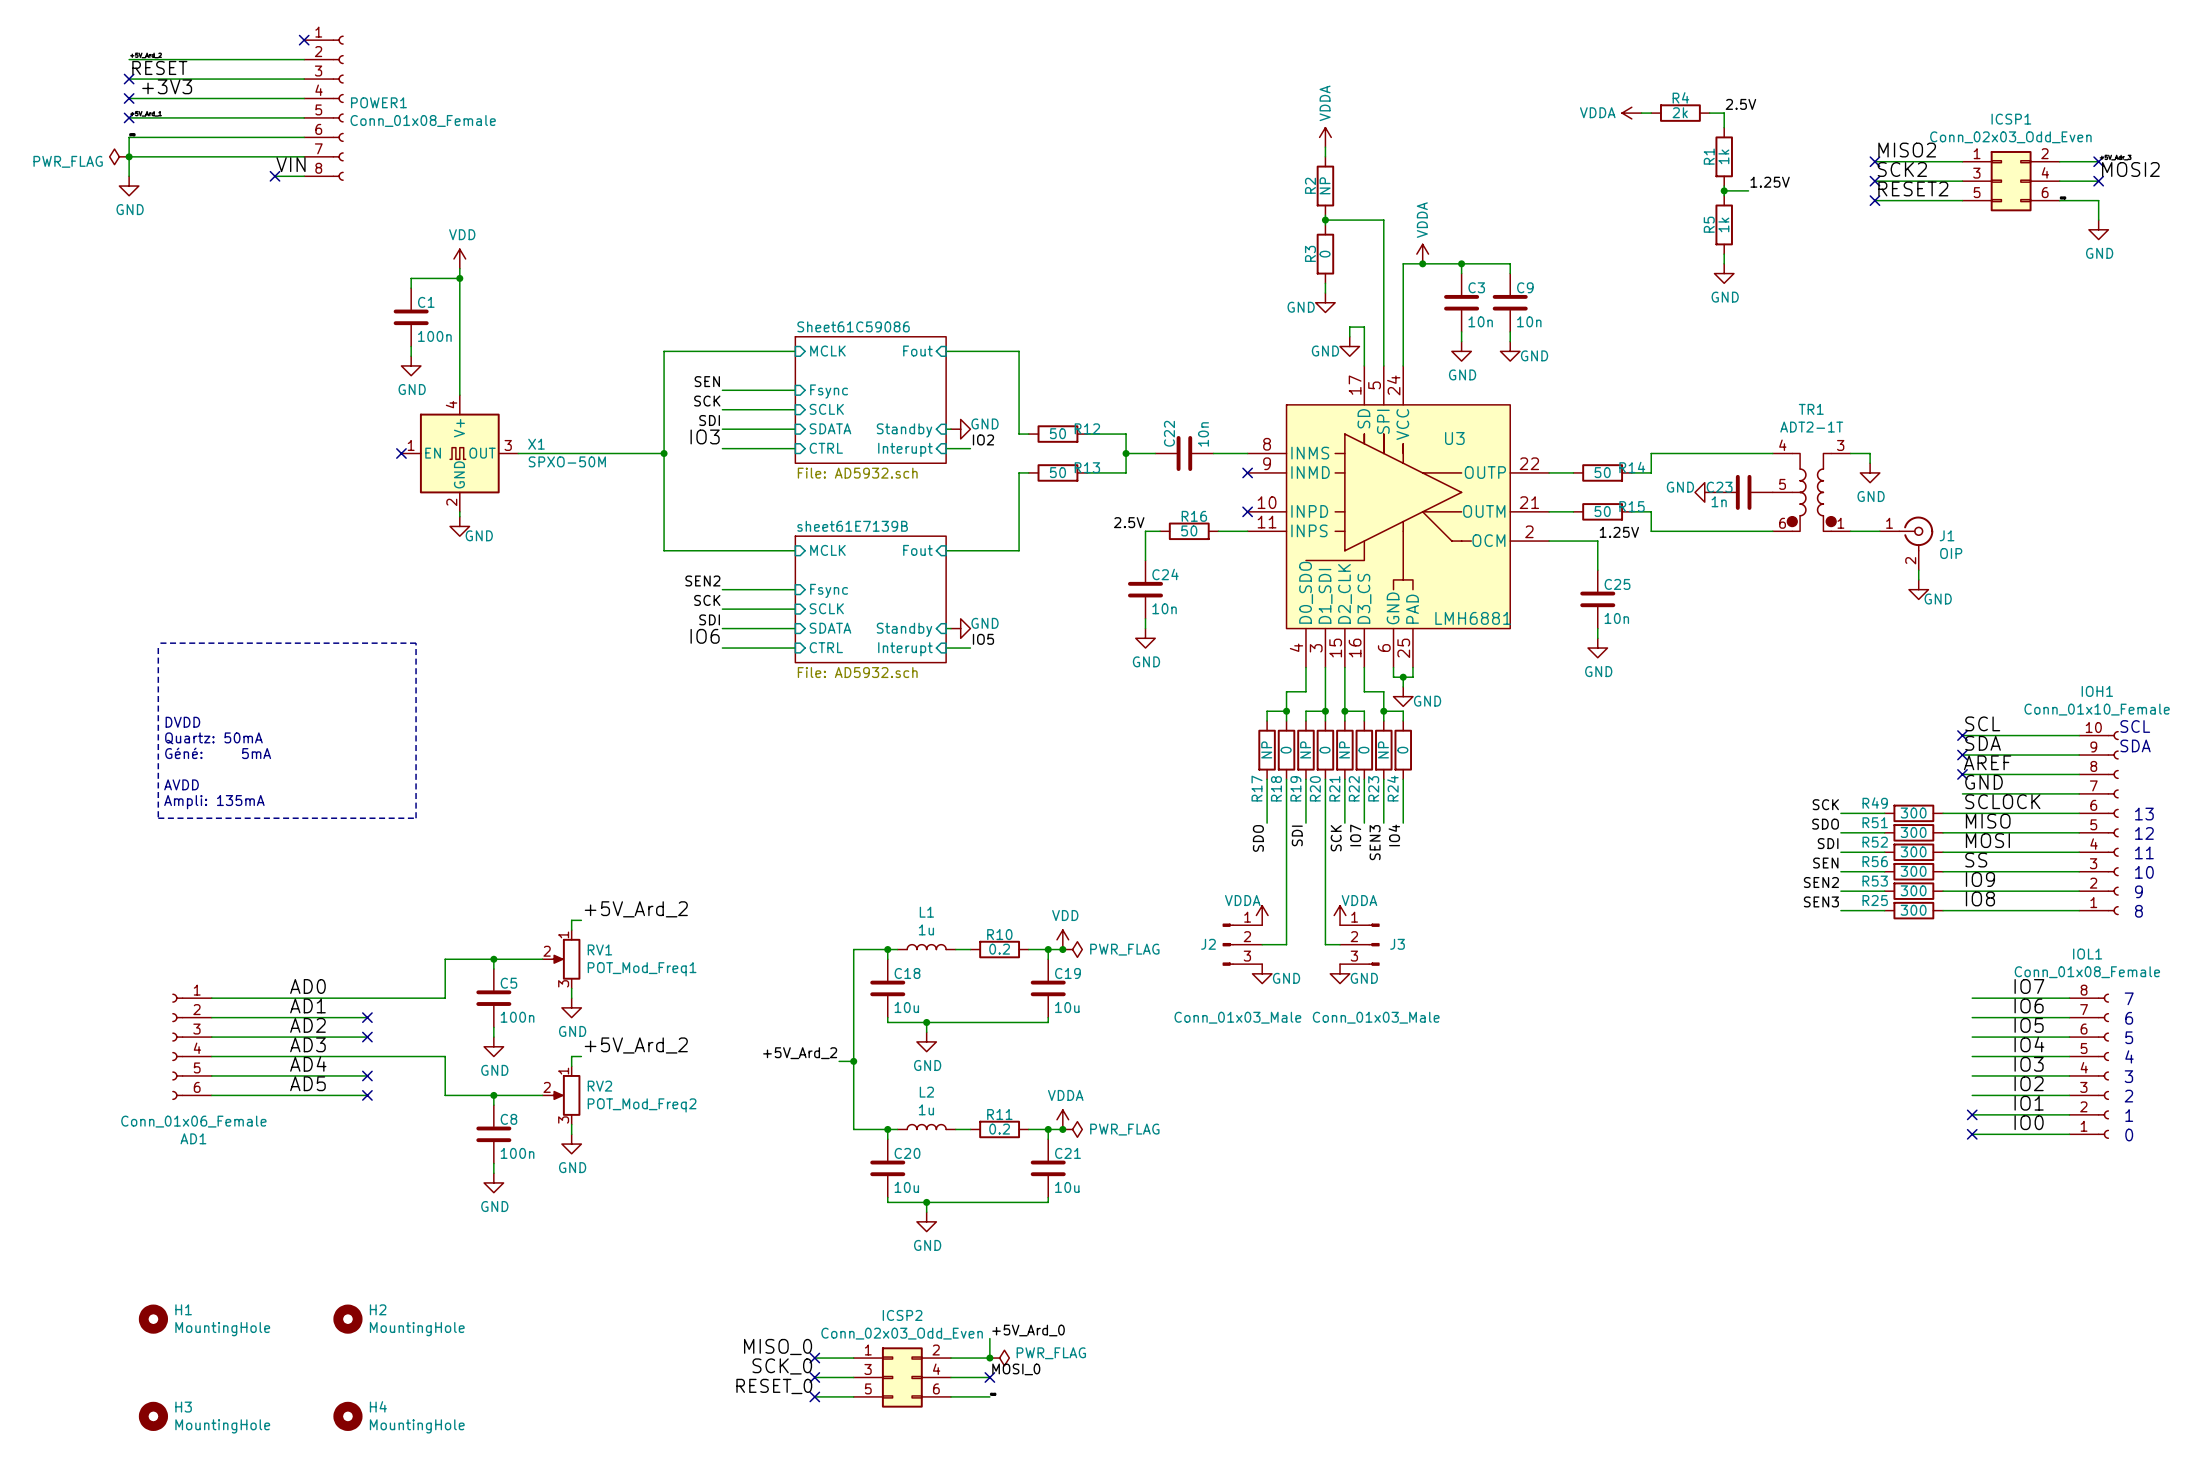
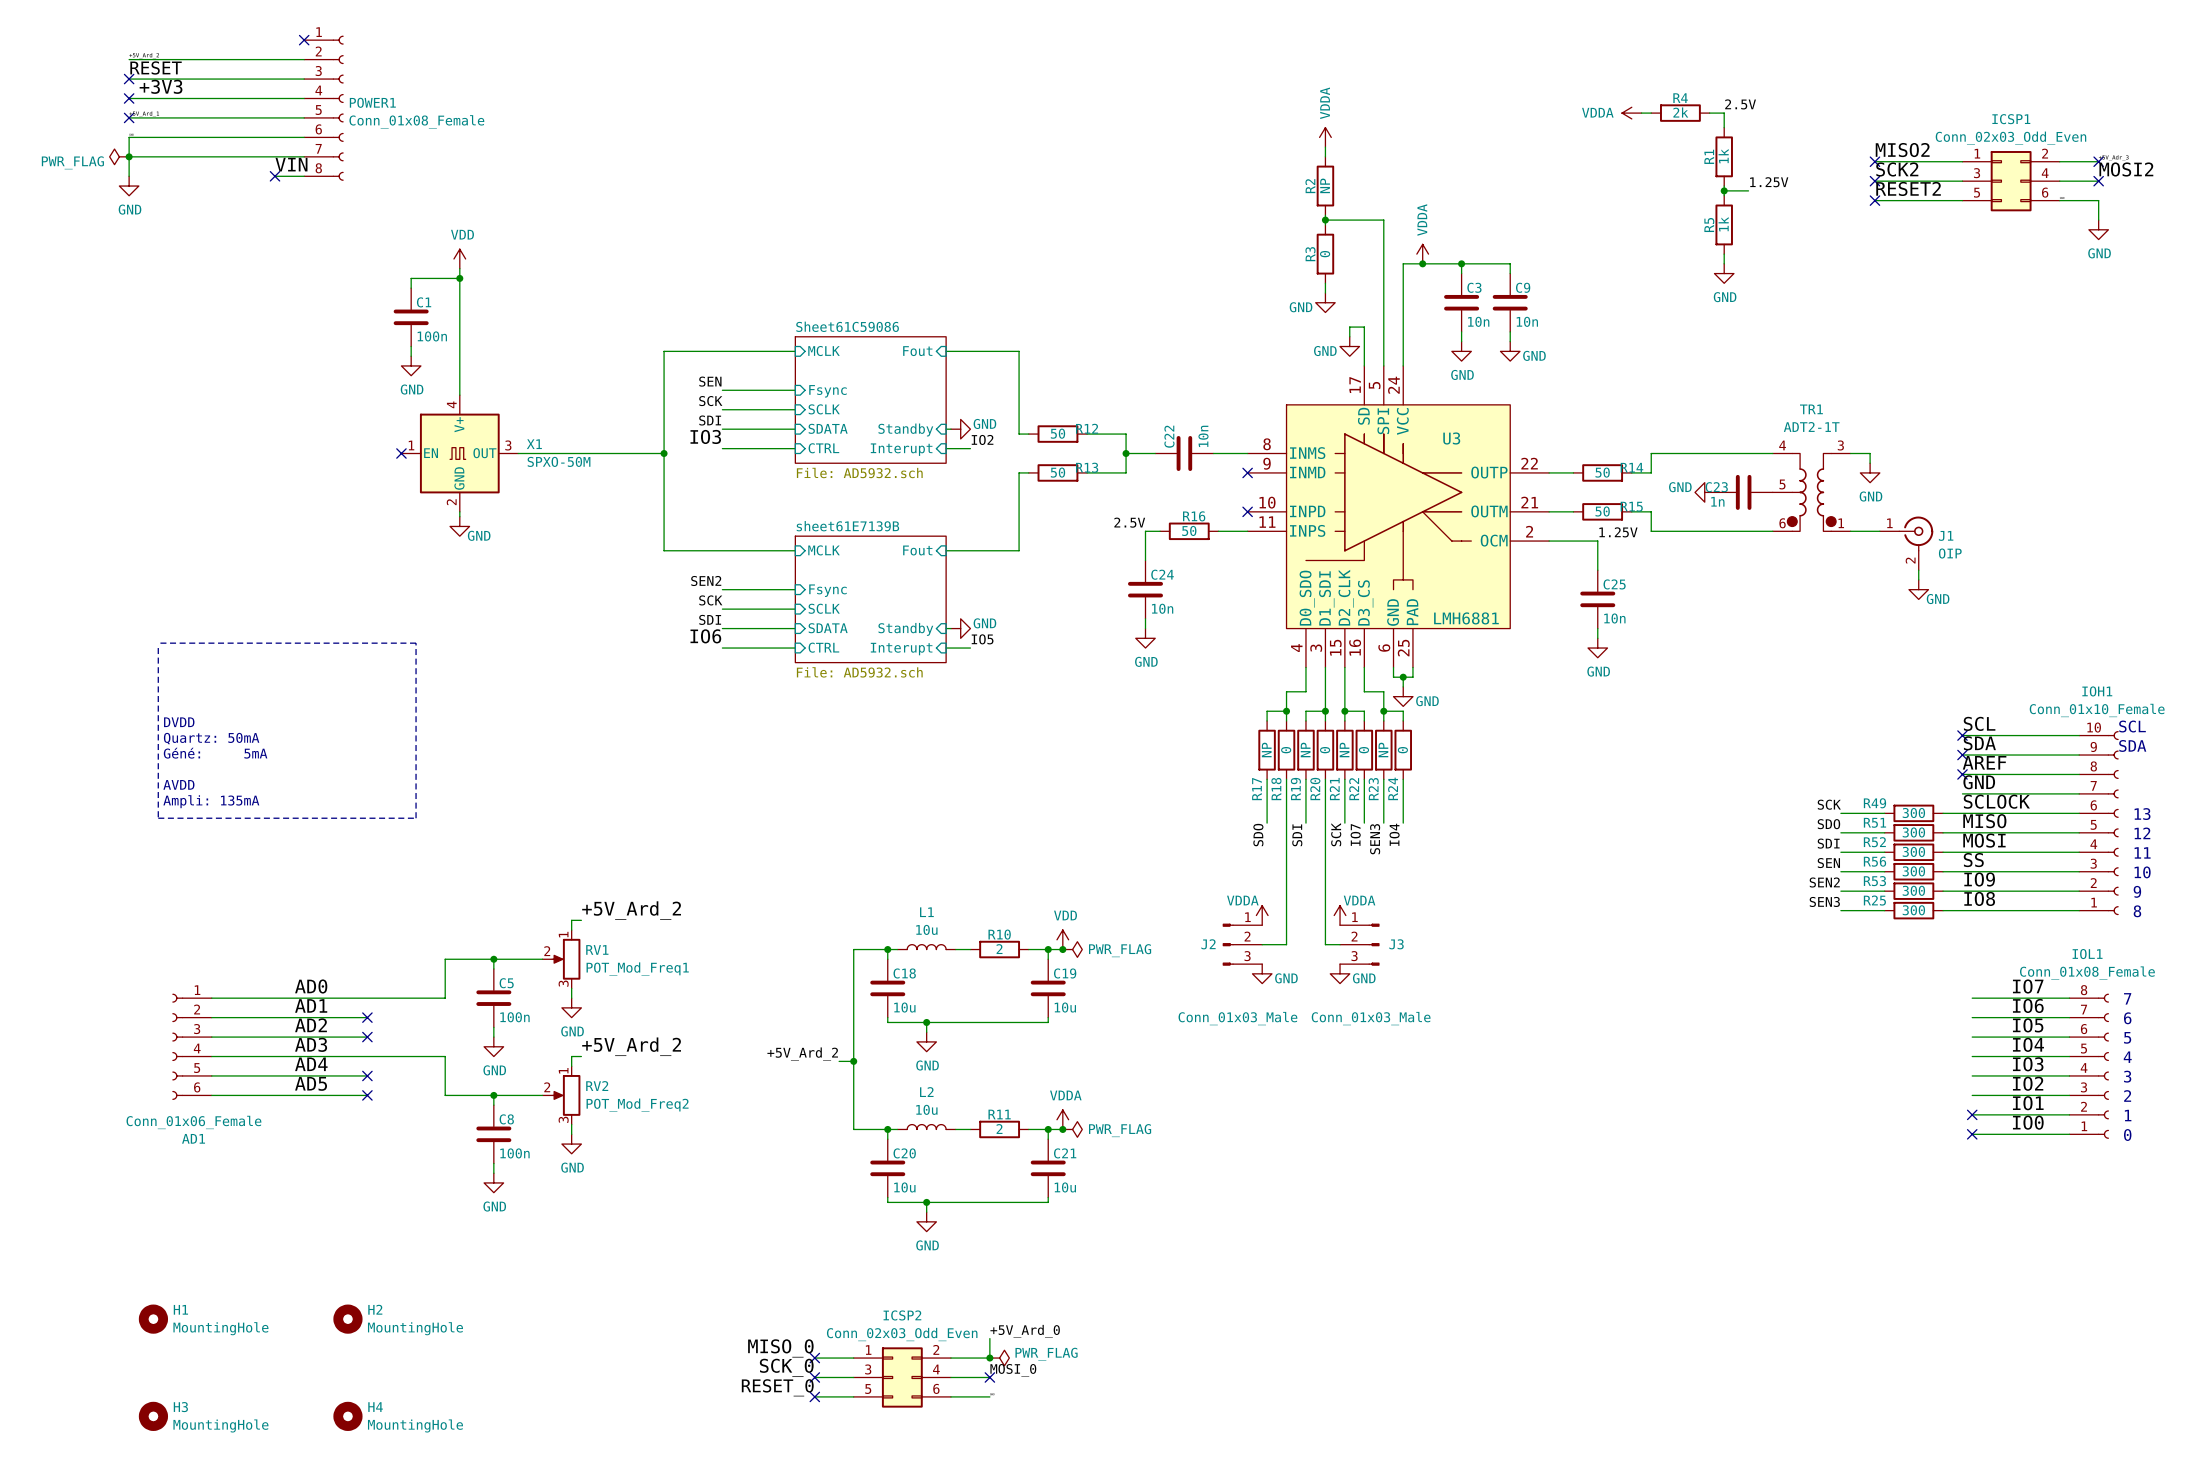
L1 value: 1u (926, 929) -> 10u (926, 929)
R10 value: 0.2 (999, 949) -> 2 (999, 949)
L2 value: 1u (926, 1109) -> 10u (926, 1109)
R11 value: 0.2 (999, 1129) -> 2 (999, 1129)

